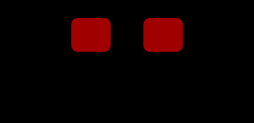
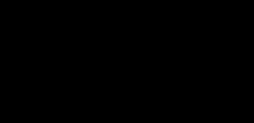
part: (127, 34) -> none

